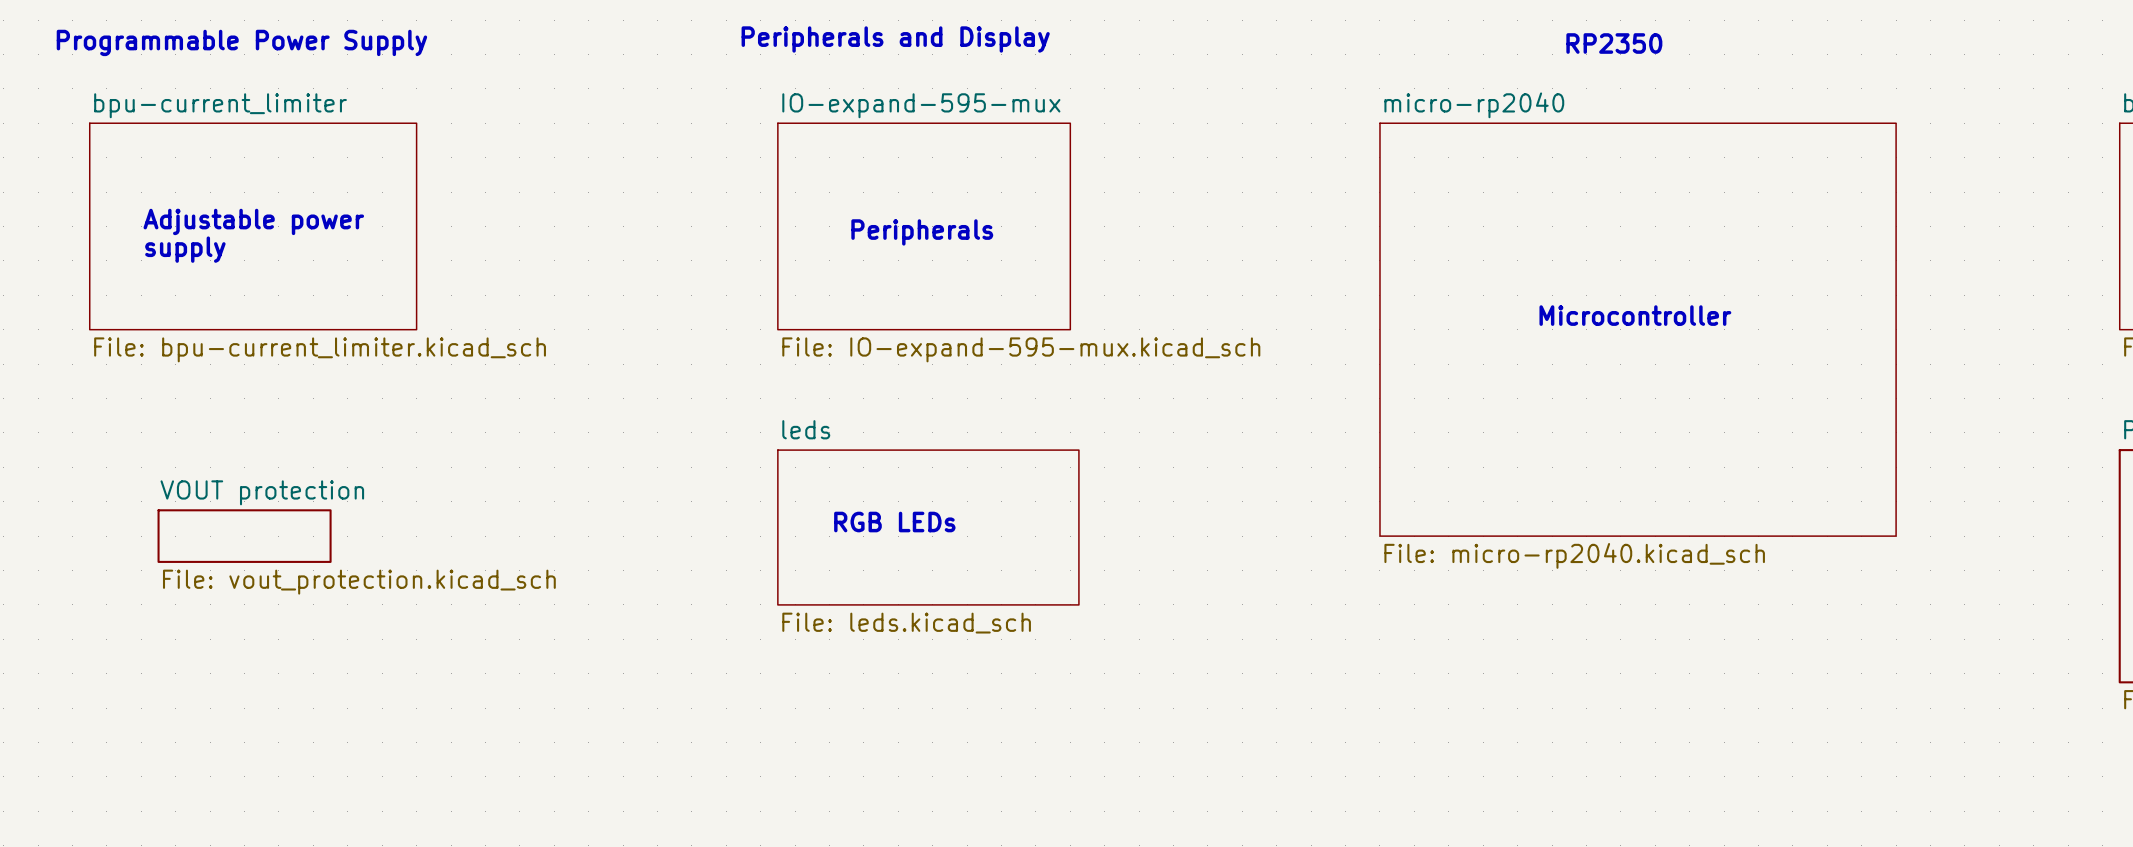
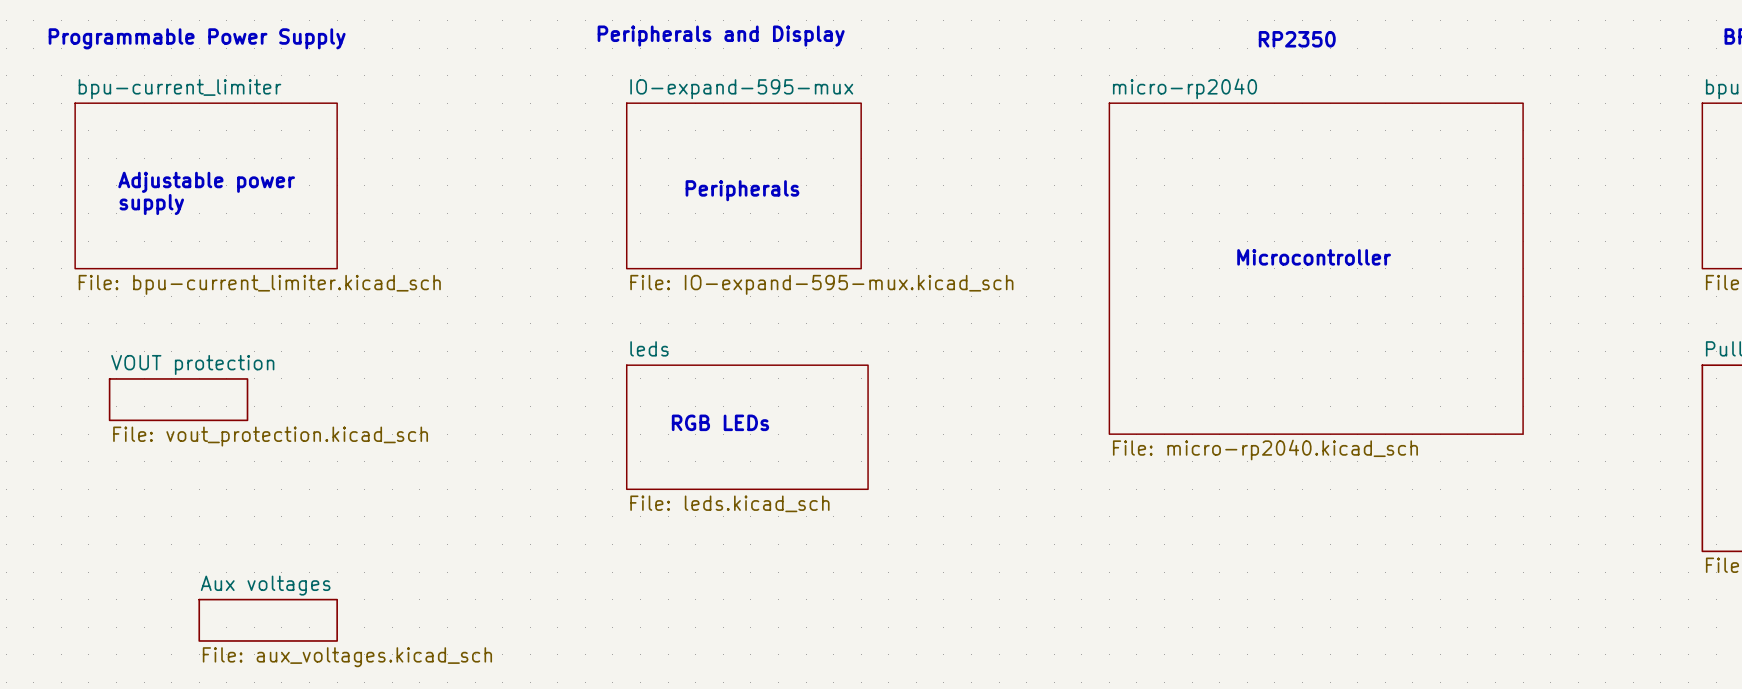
sheet VOUT protection position: (244, 536) -> (178, 399)
sheet Aux voltages: none -> File: aux_voltages.kicad_sch (268, 620)

